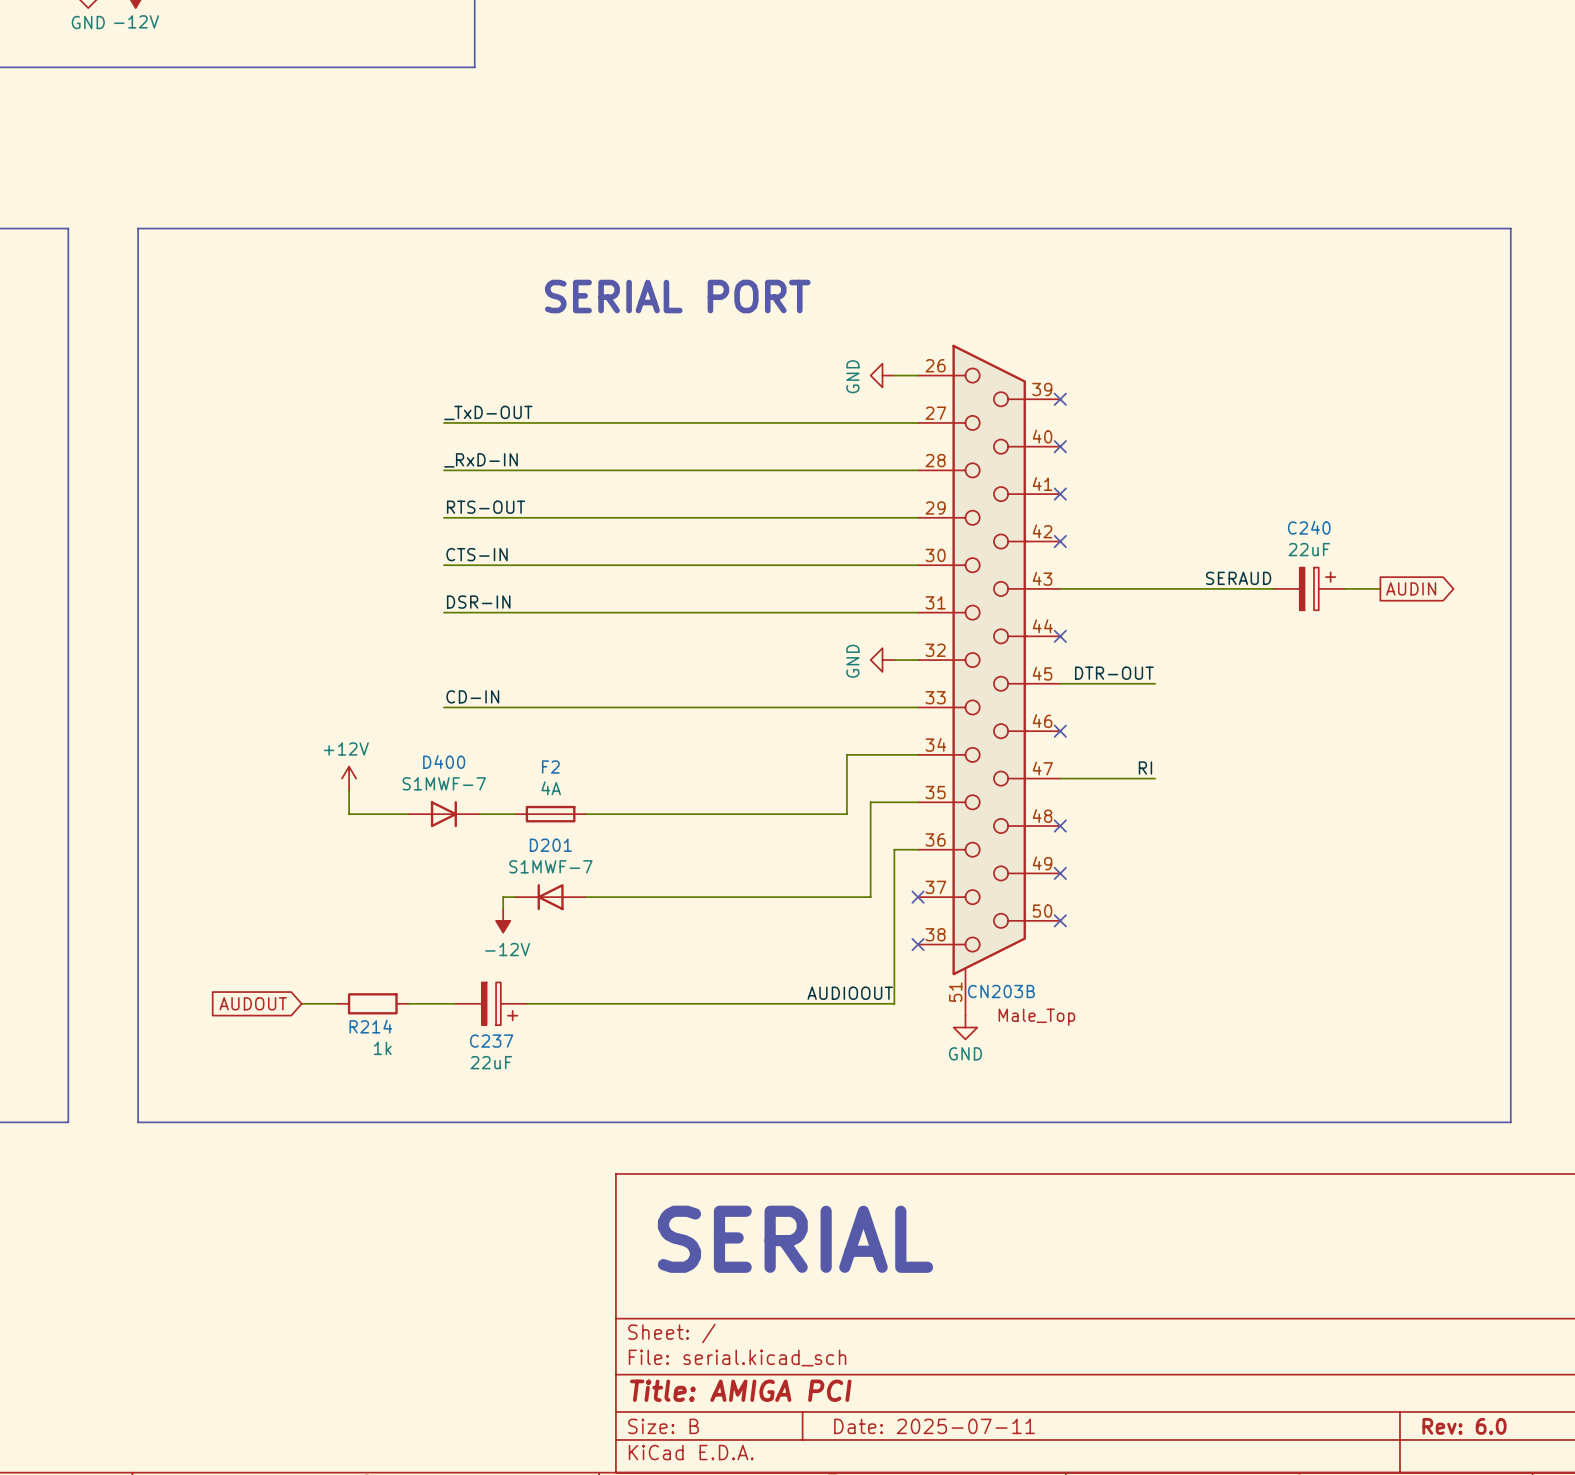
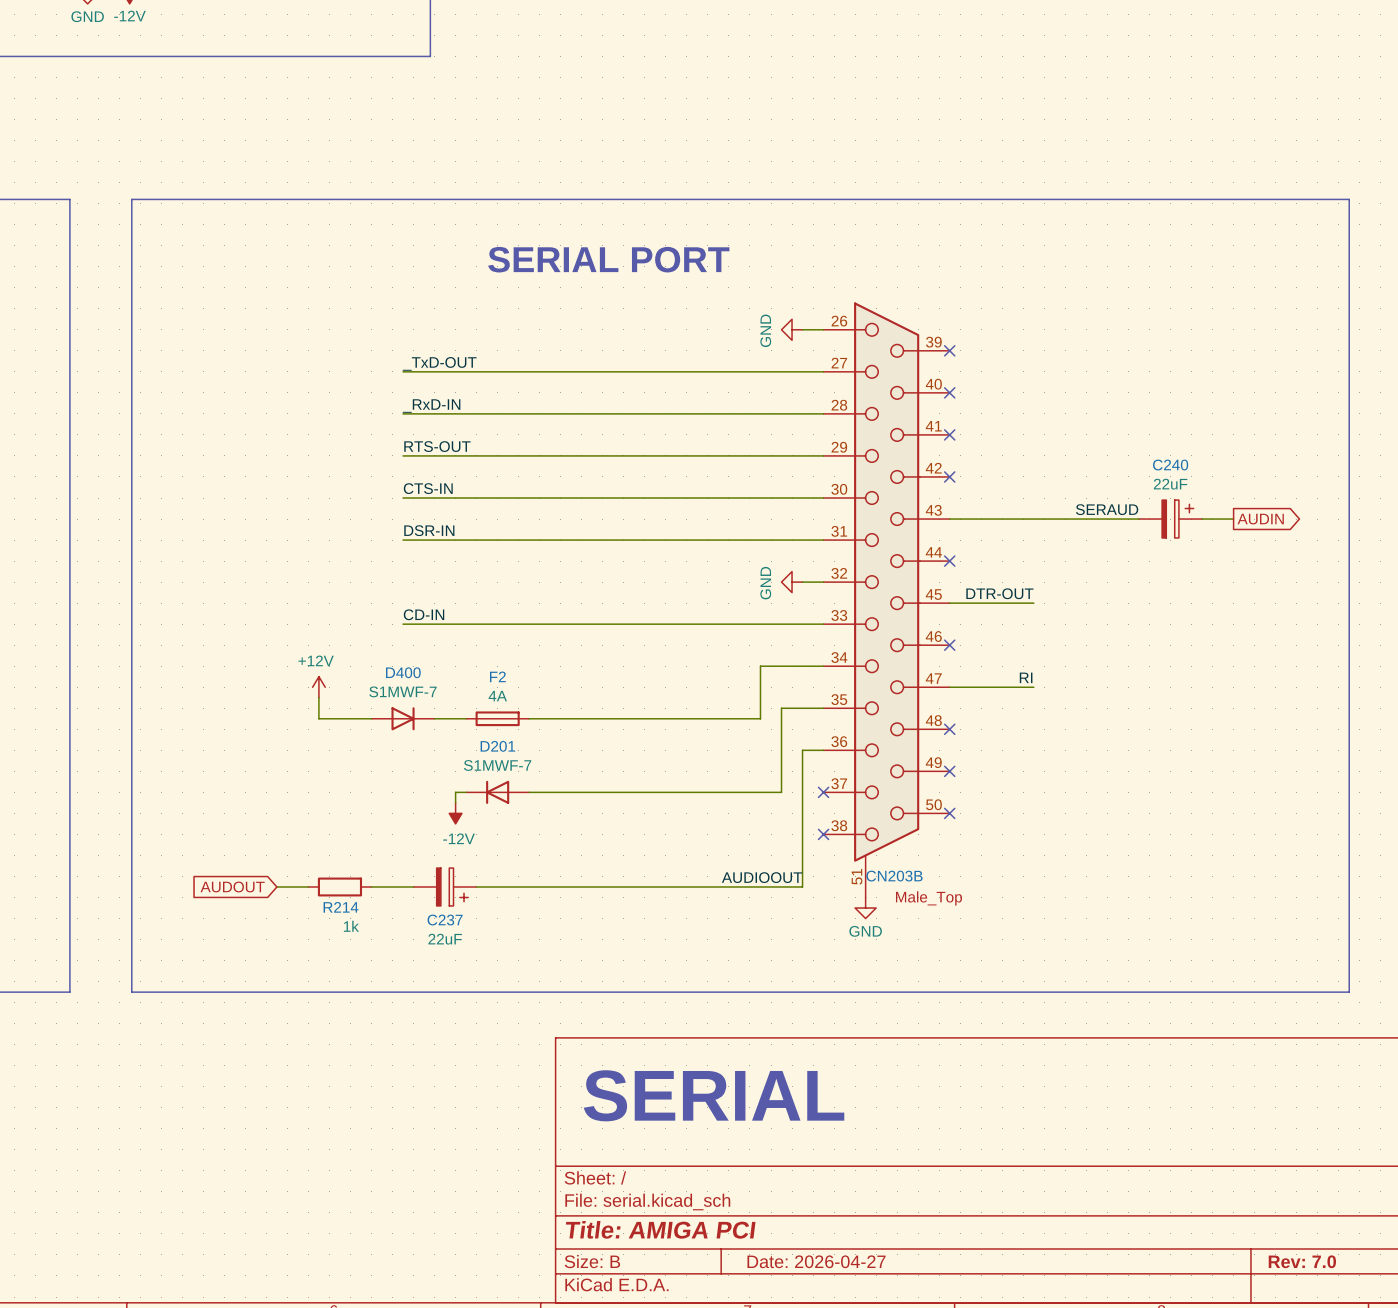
title block: Date: 2025-07-11 (934, 1426) -> Date: 2026-04-27 (816, 1261)
title block: Rev: 6.0 (1464, 1426) -> Rev: 7.0 (1302, 1261)

